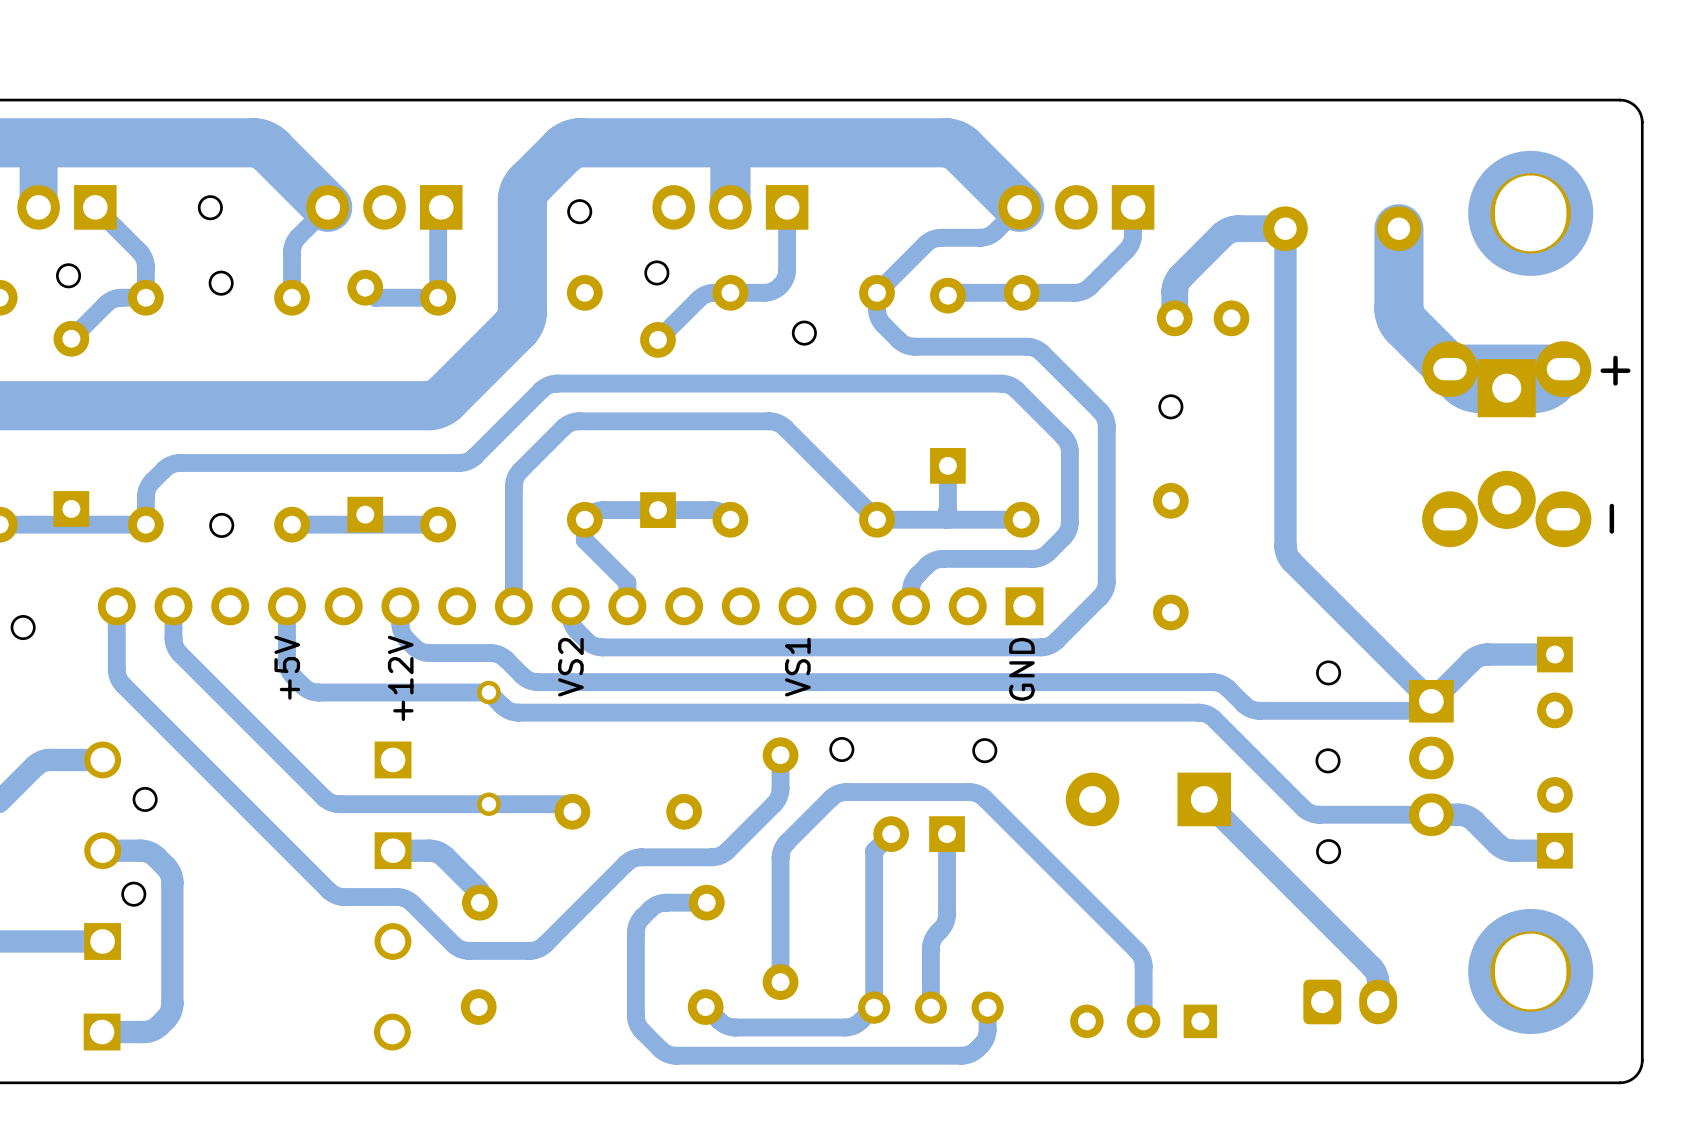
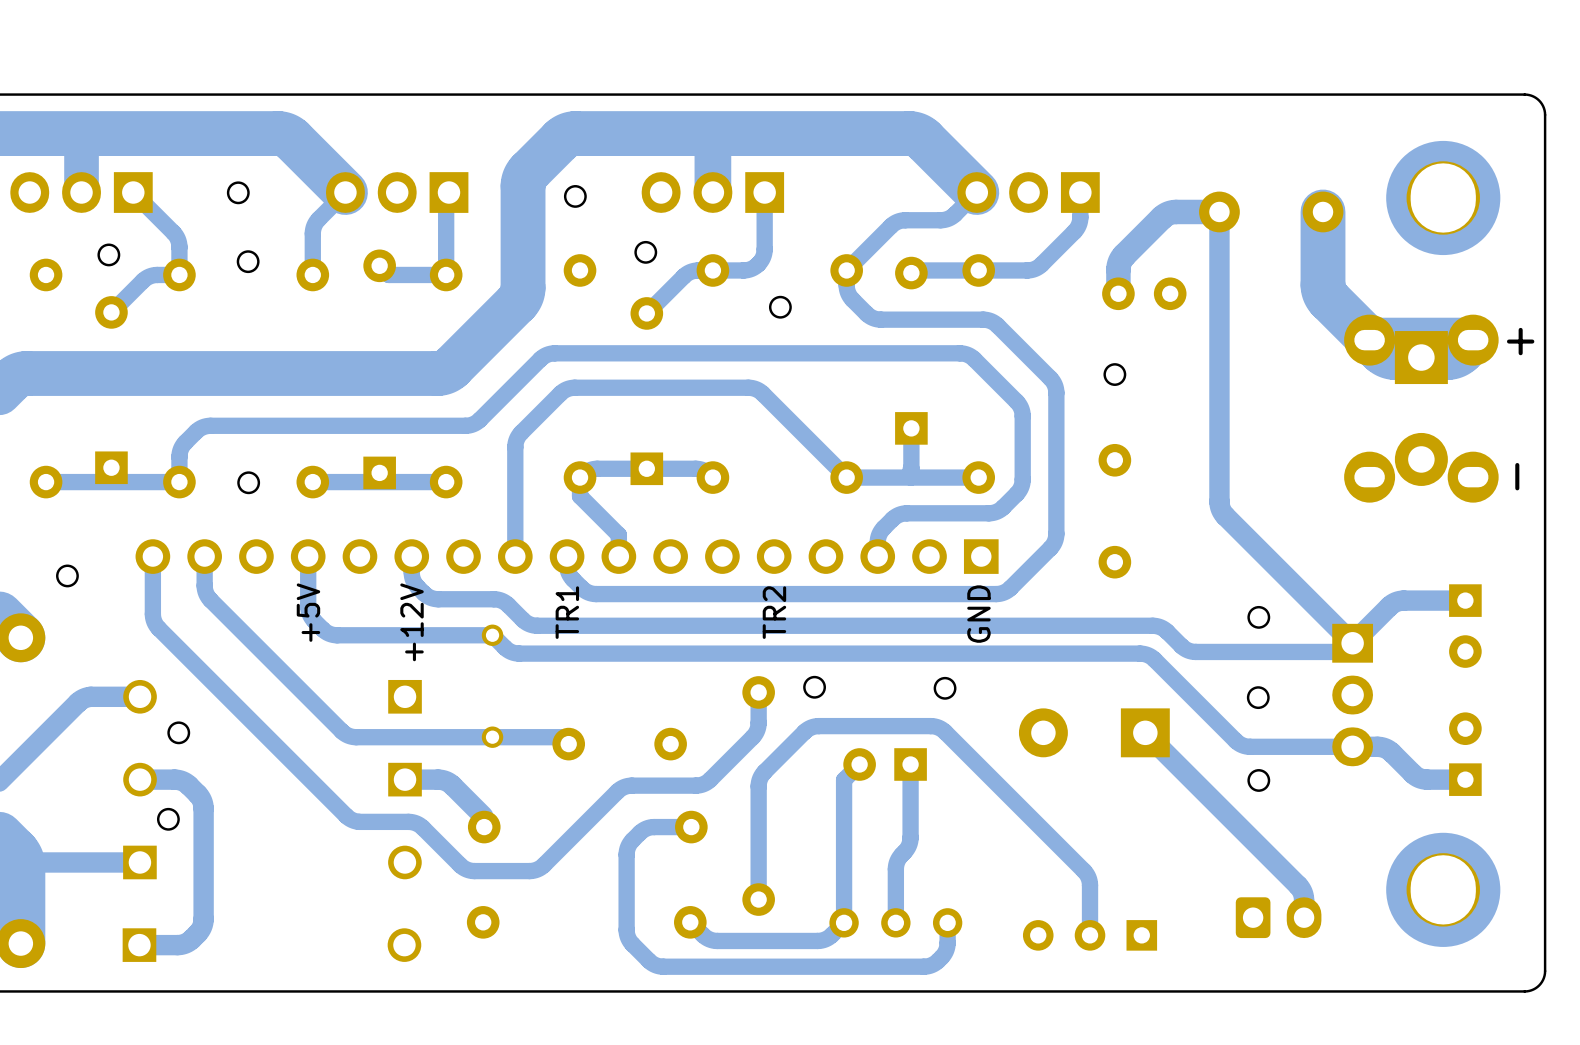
text: VS2 (570, 667) -> TR1 (567, 612)
text: VS1 (797, 667) -> TR2 (774, 612)

